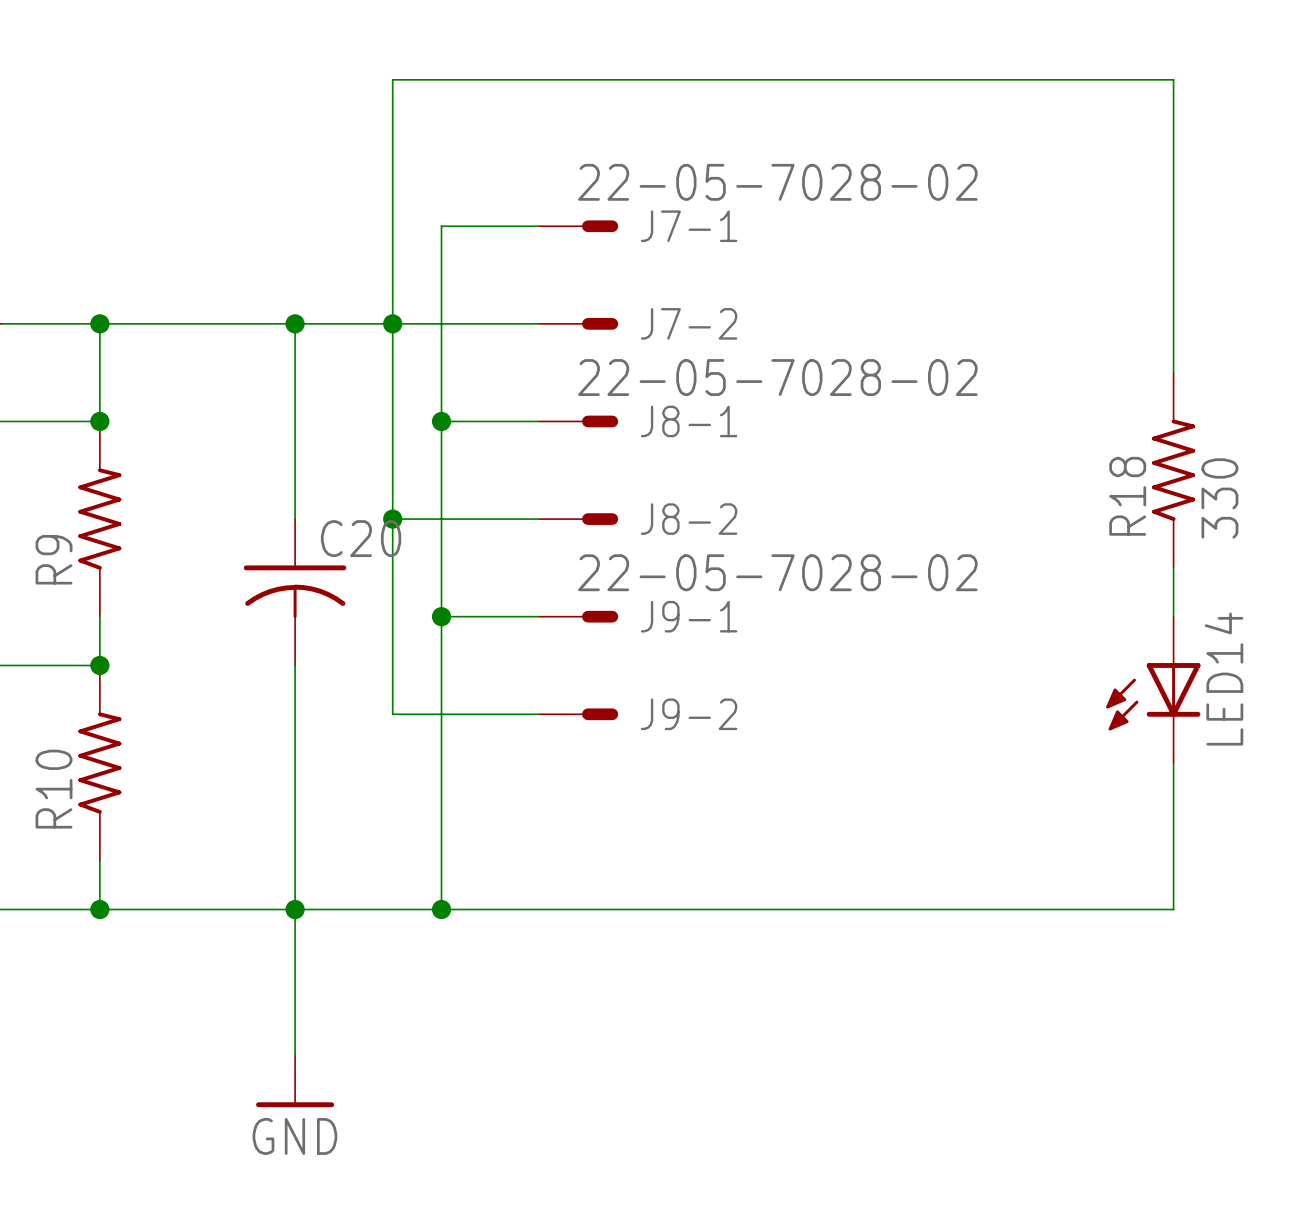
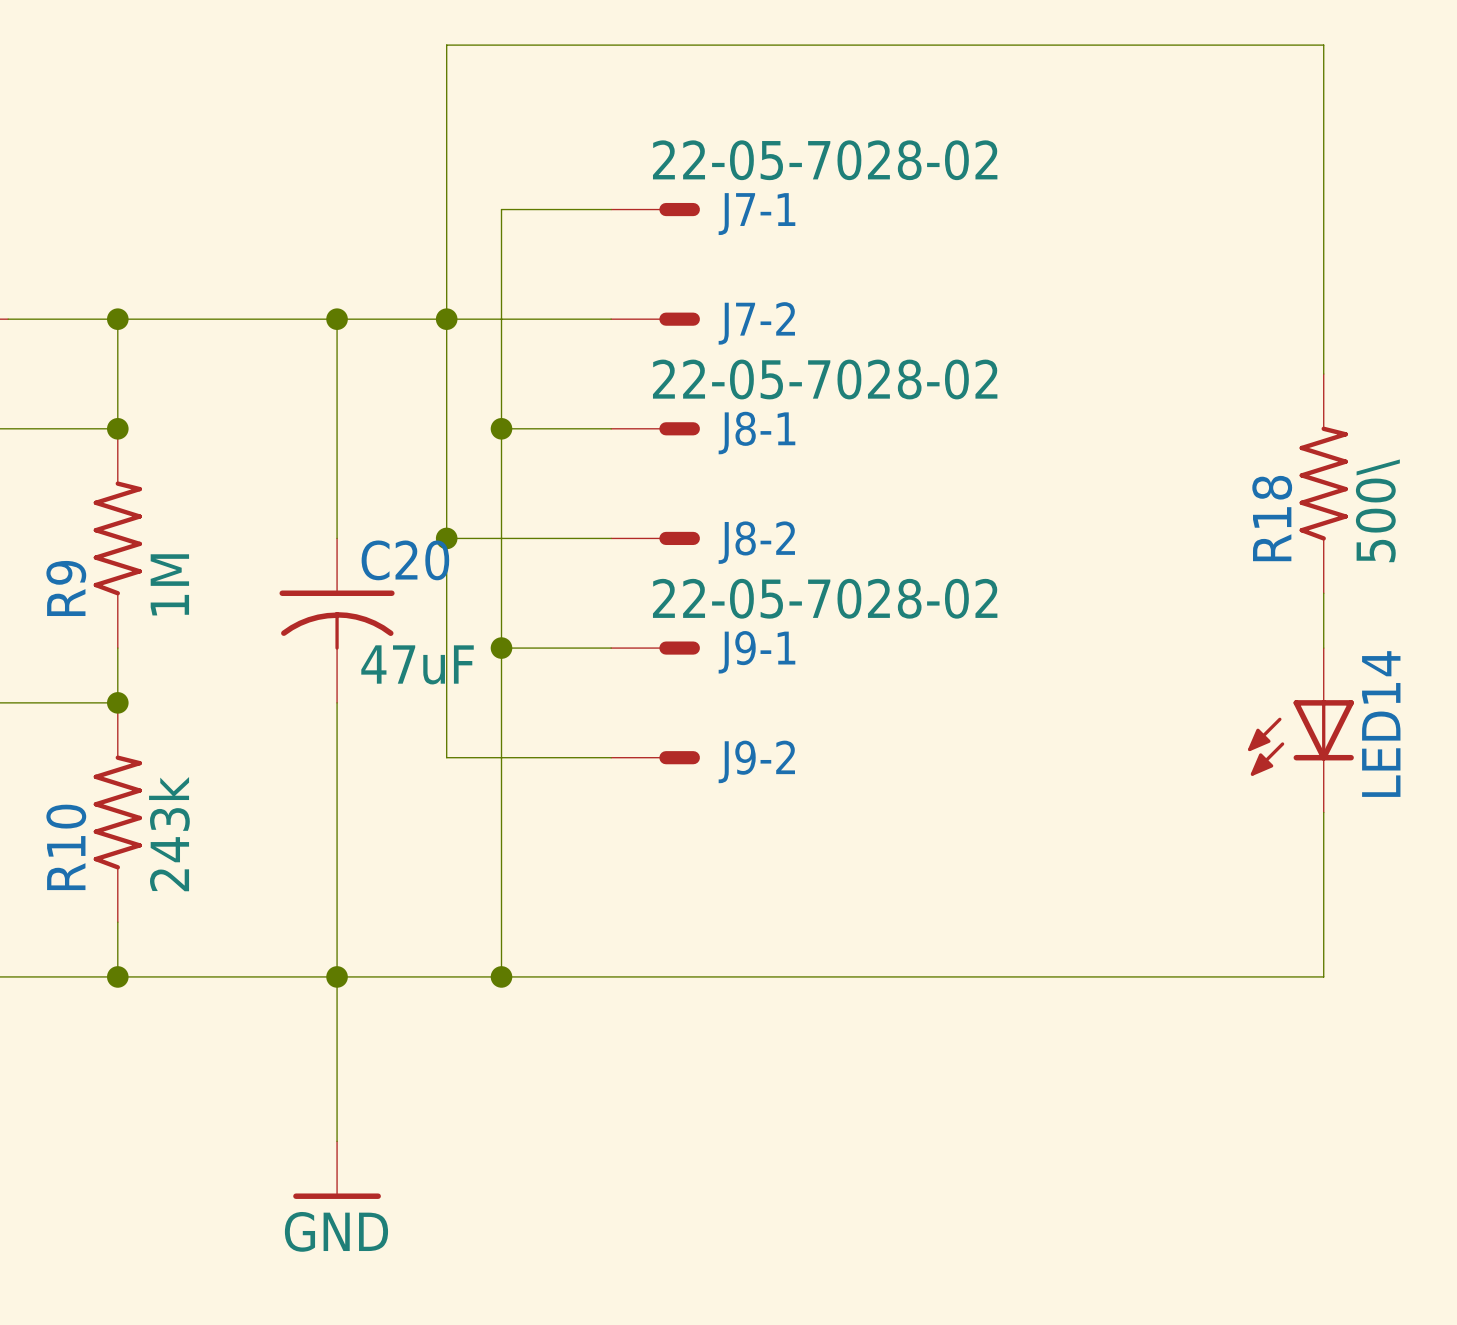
R18 value: 330 (1219, 498) -> 500\ (1377, 510)
R9 value: none -> 1M (169, 584)
C20 value: none -> 47uF (417, 664)
R10 value: none -> 243k (169, 834)

